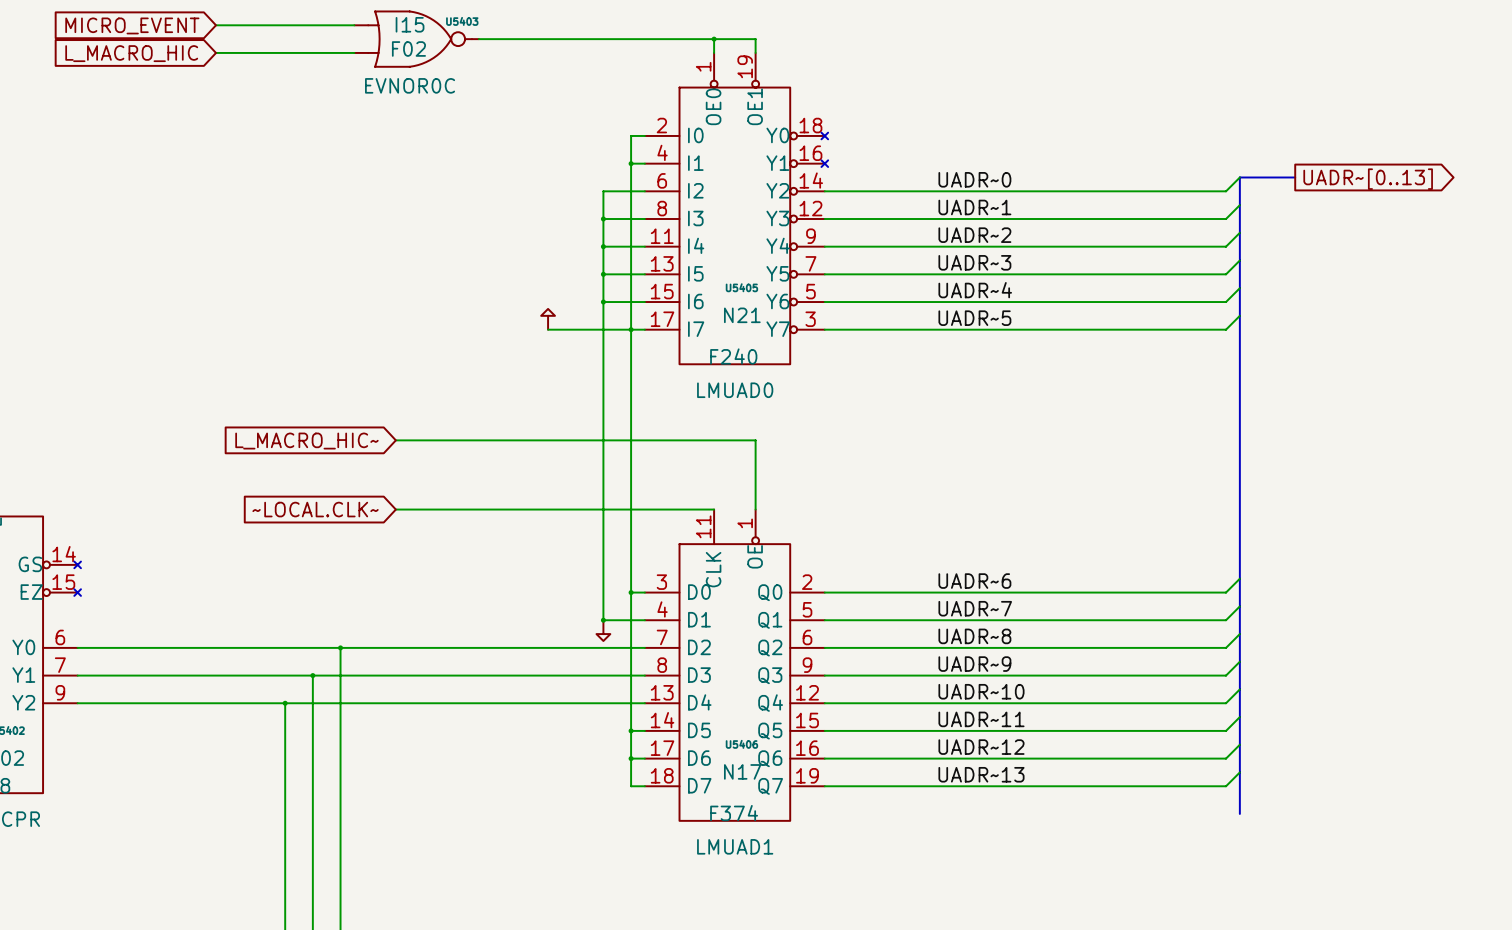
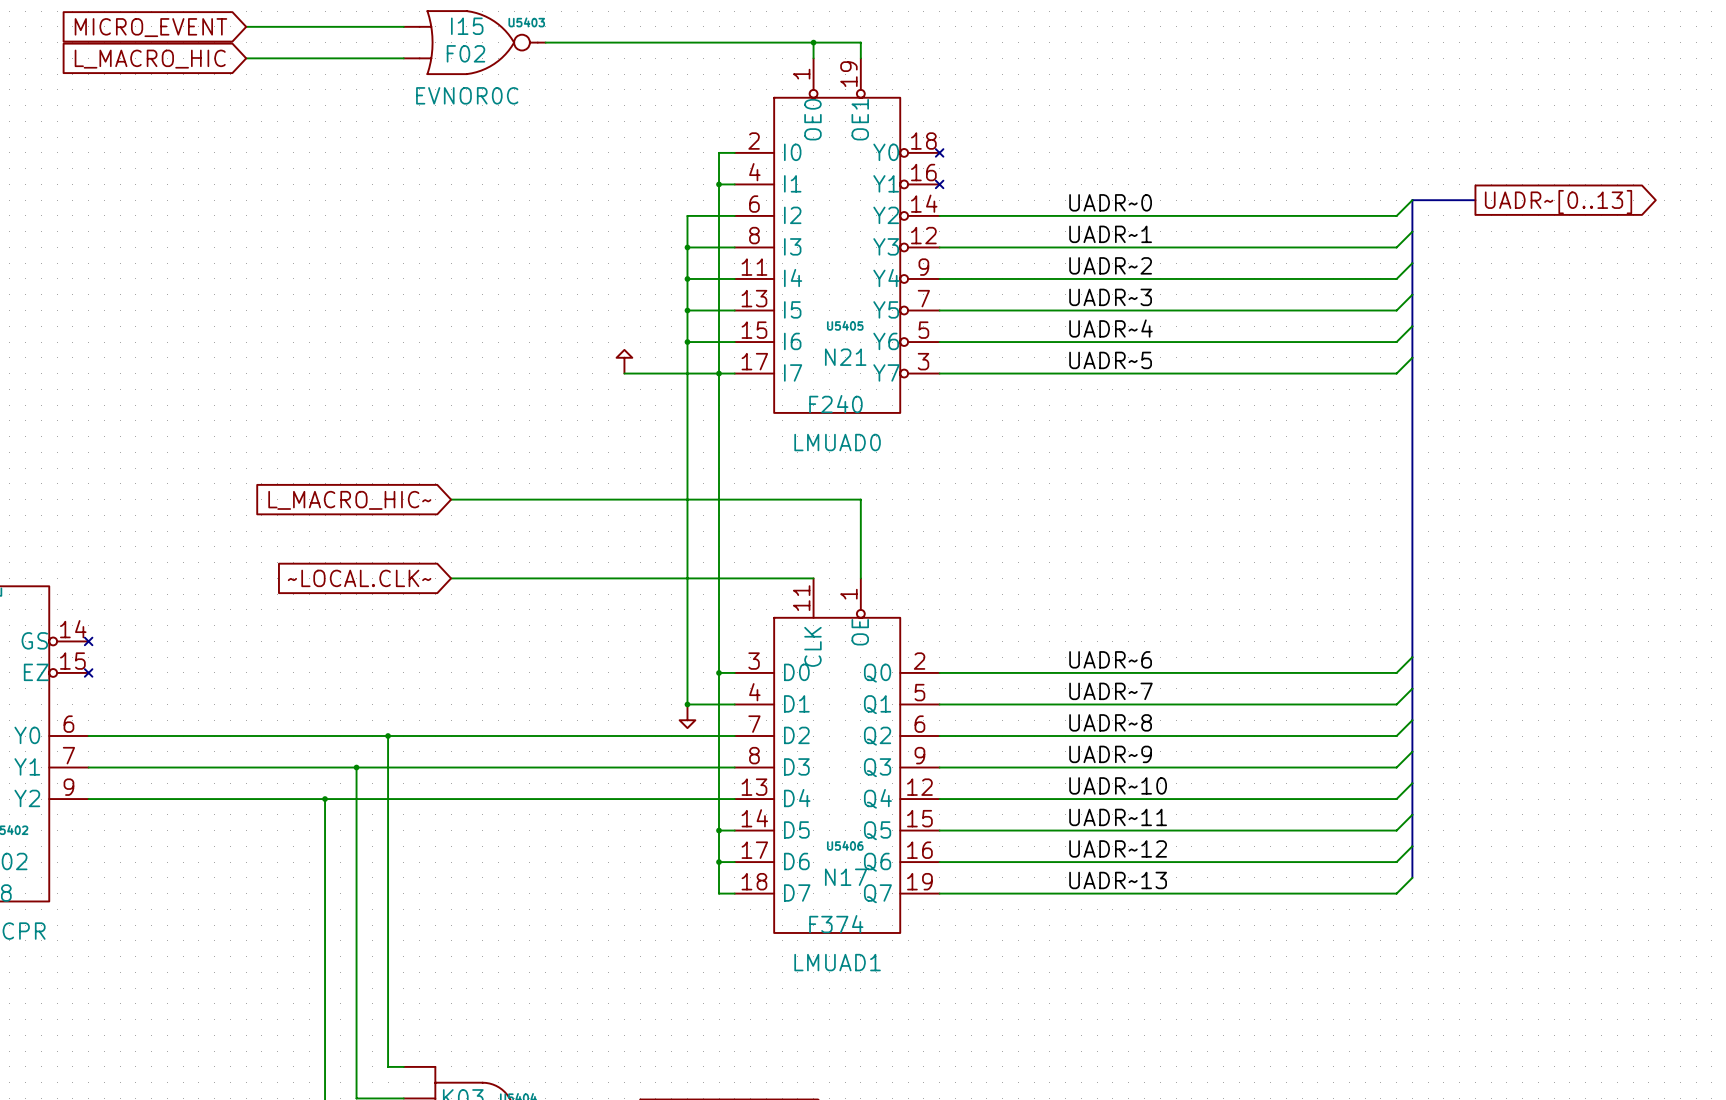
bus: (1239, 772) (1239, 813) -> none

